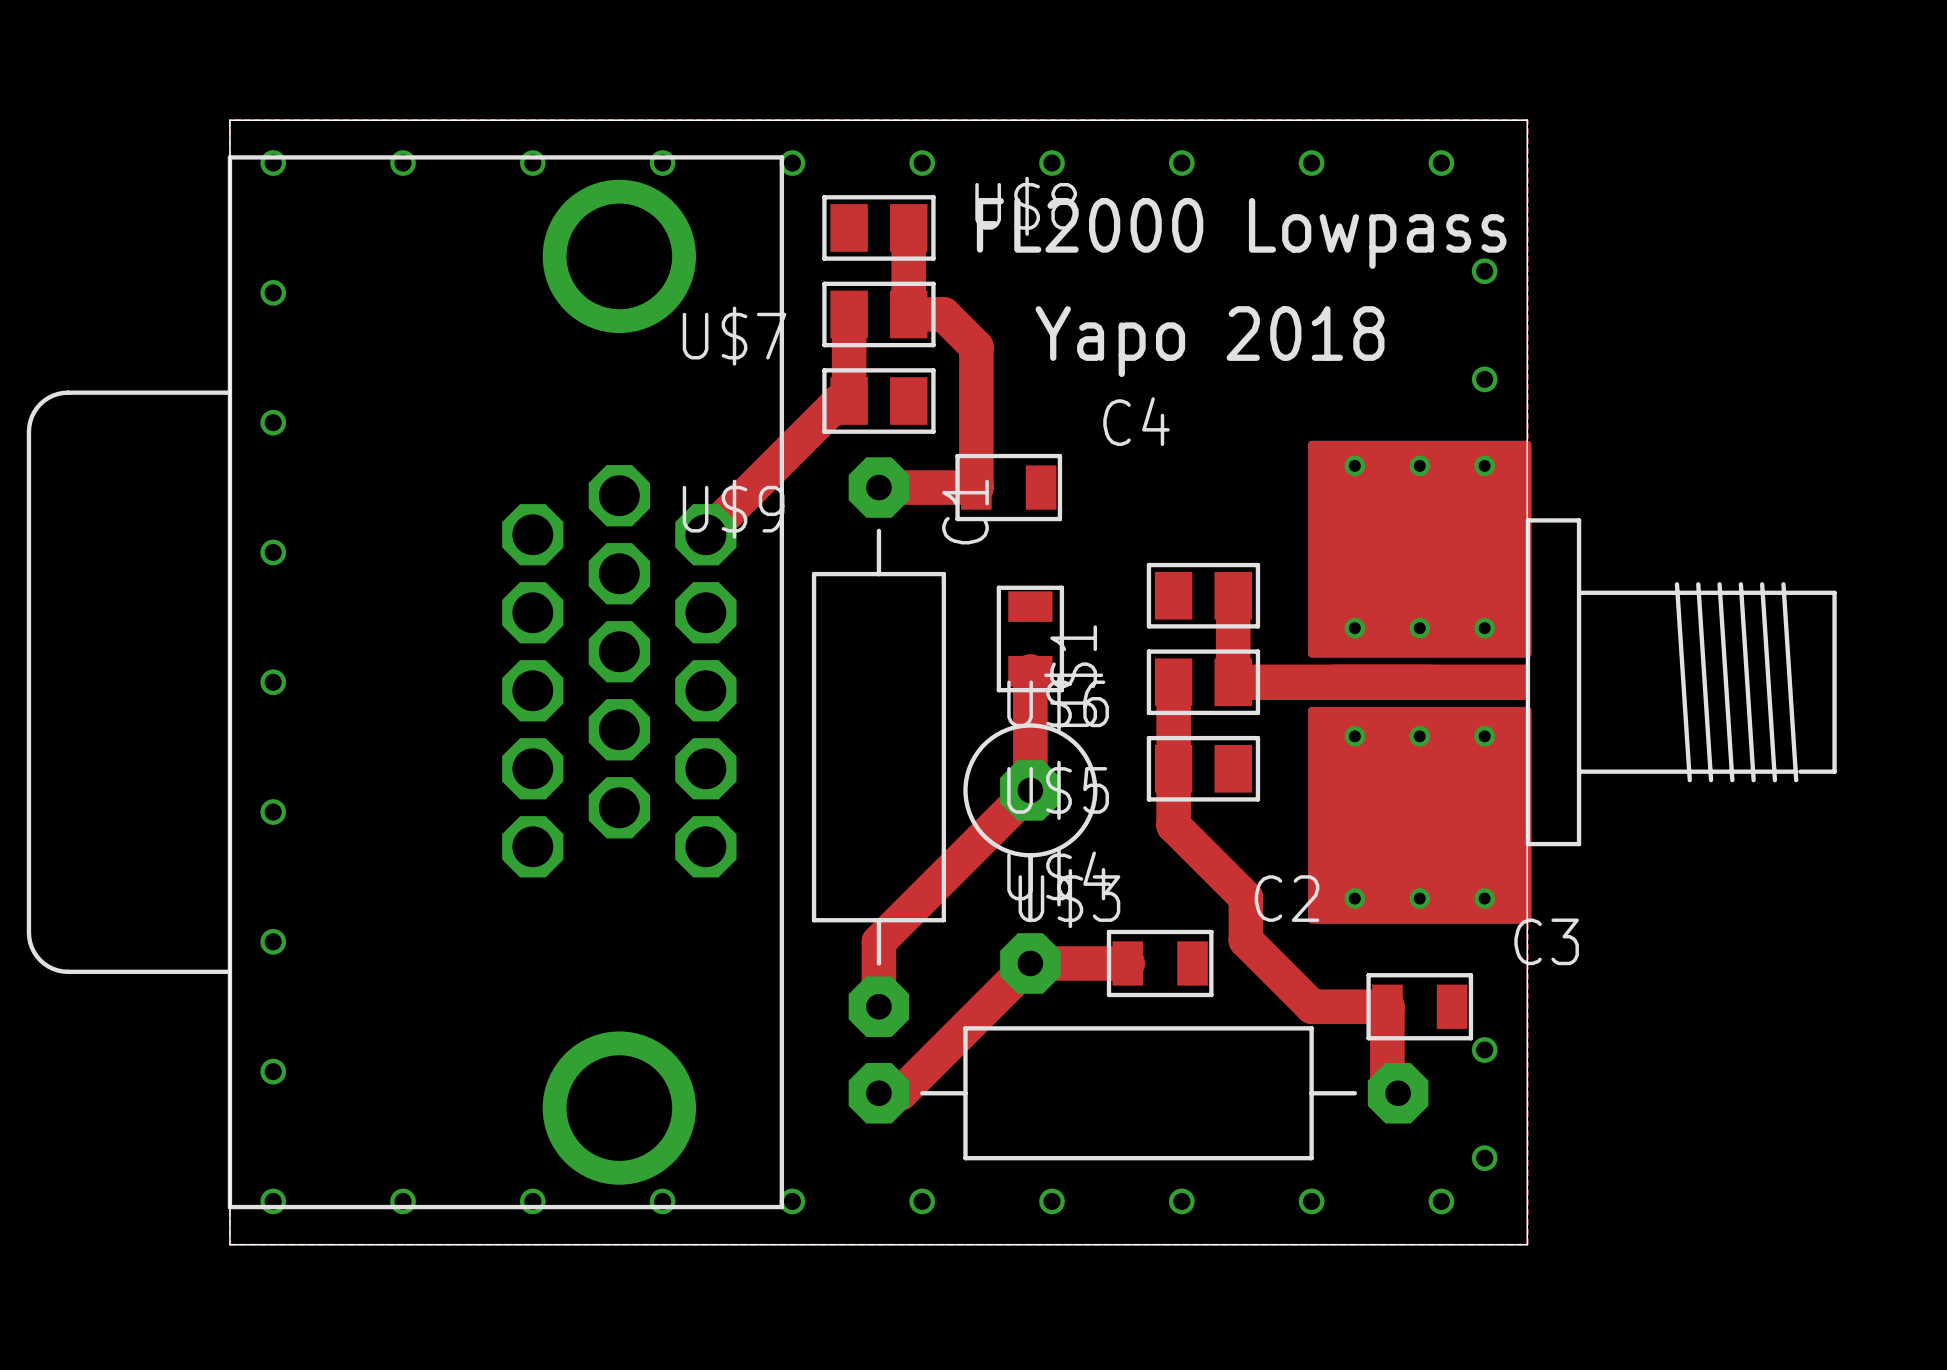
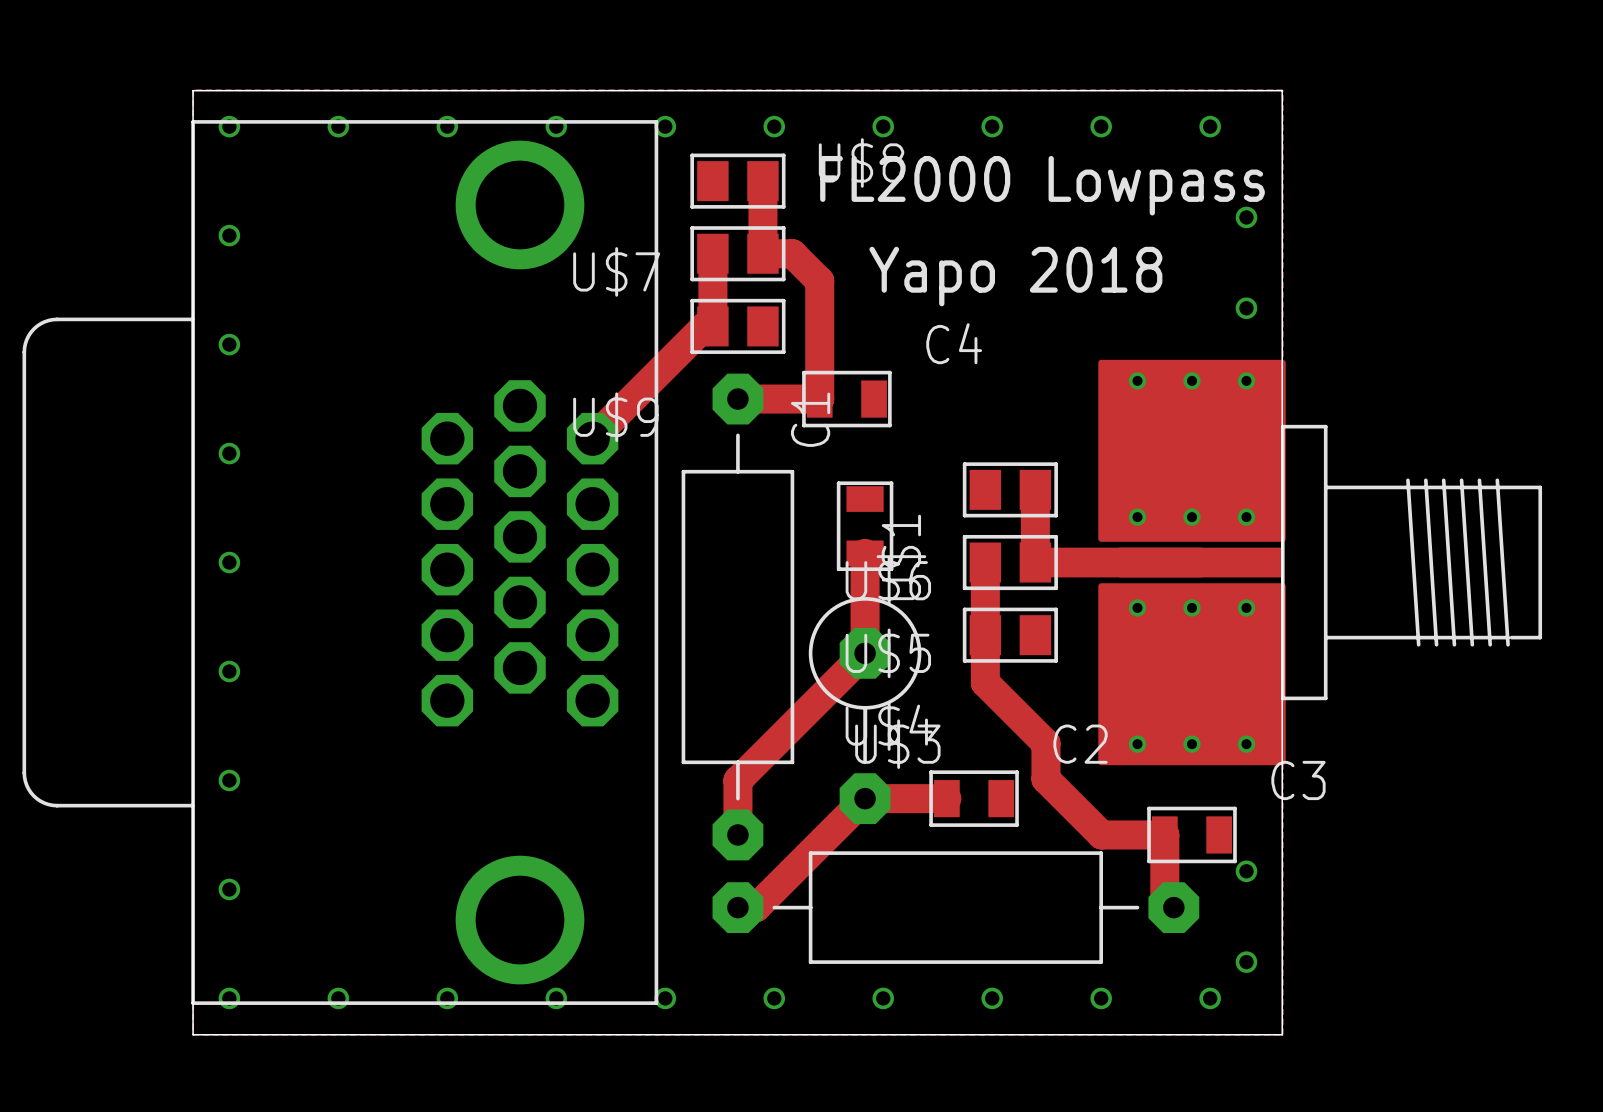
part footprint: [1308, 440, 1837, 924] -> [1098, 359, 1543, 766]

